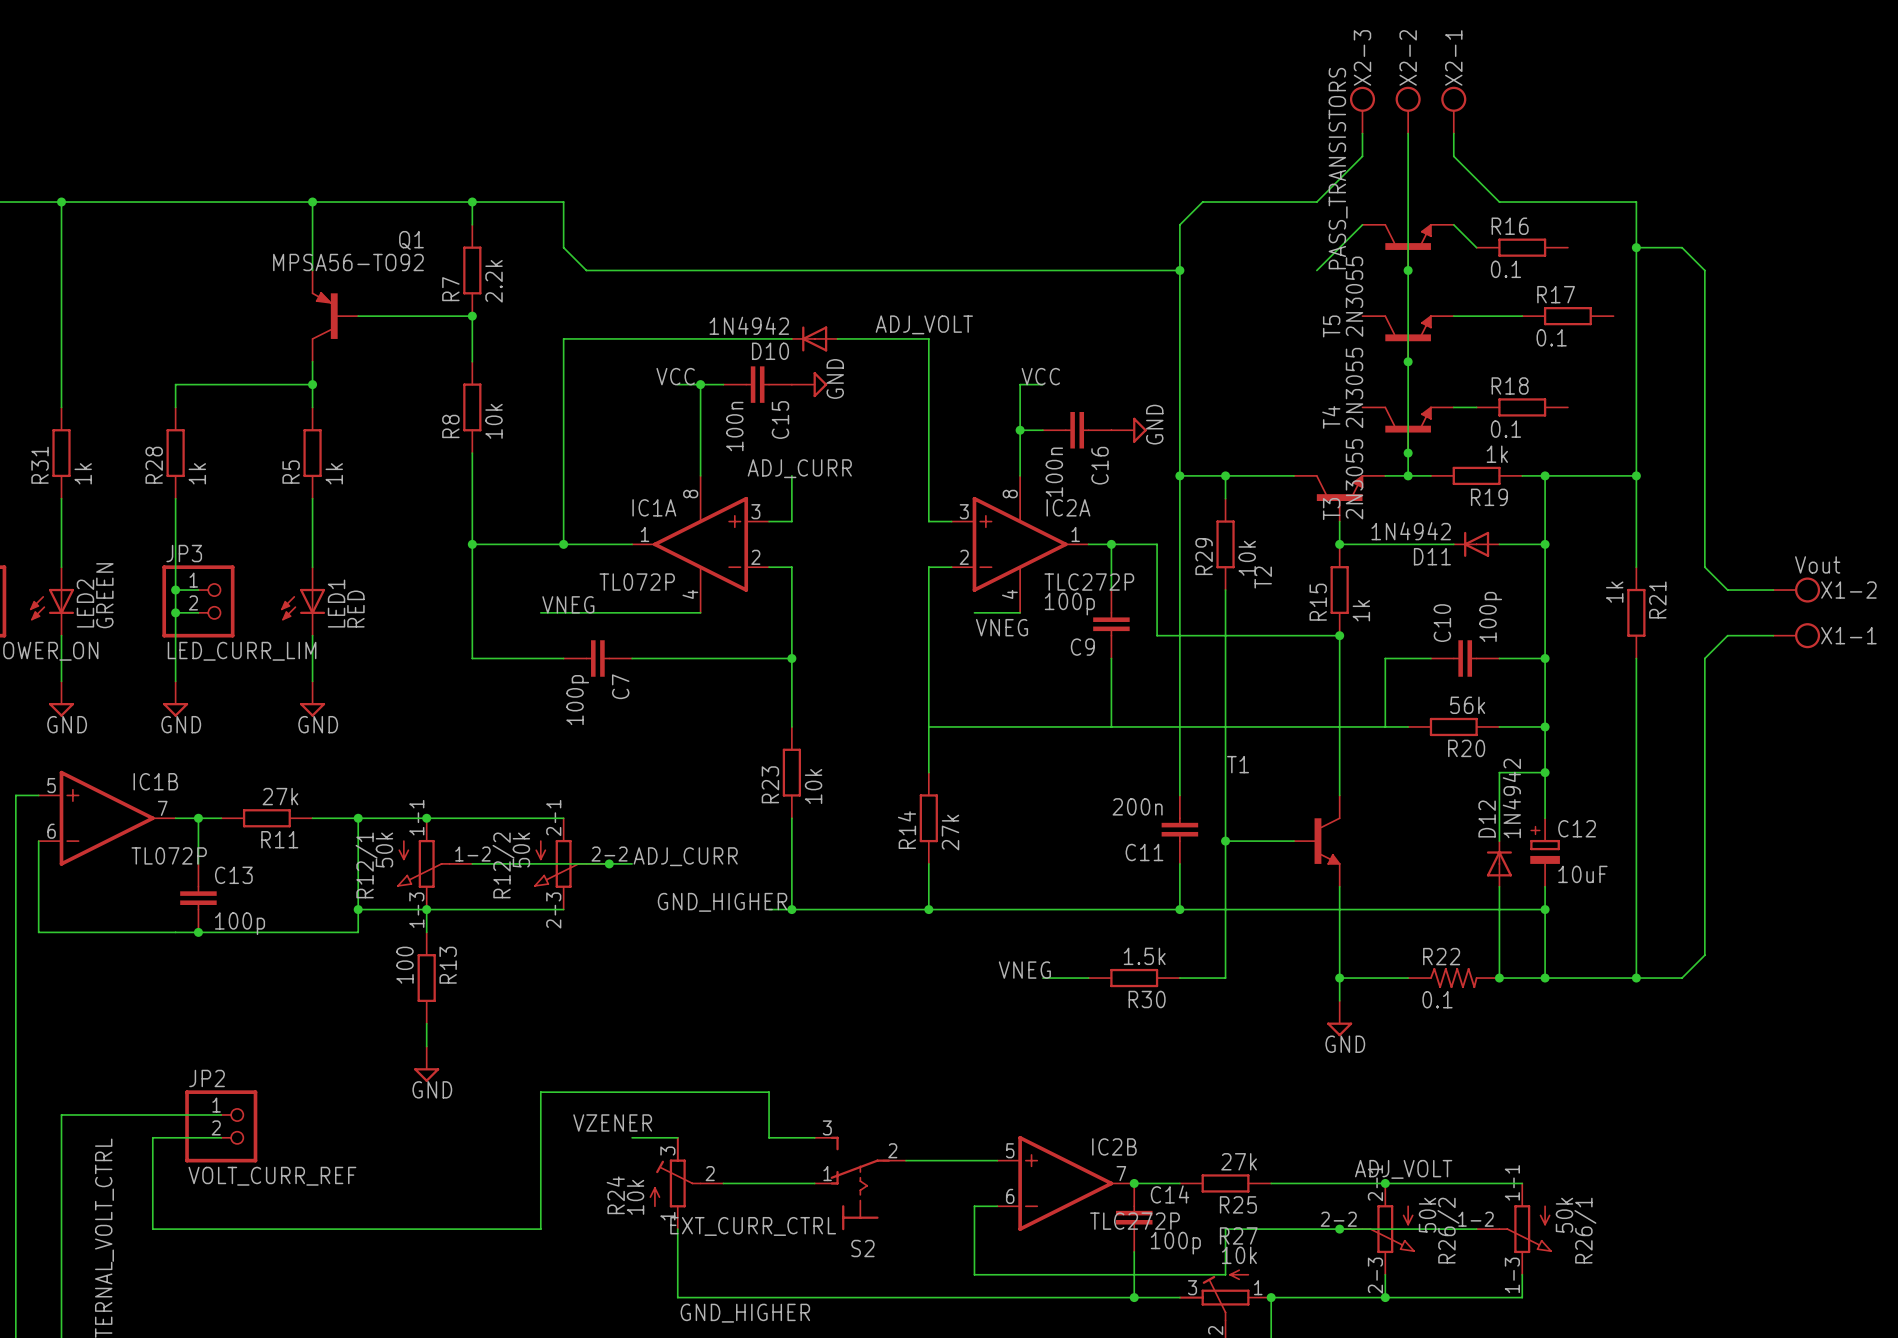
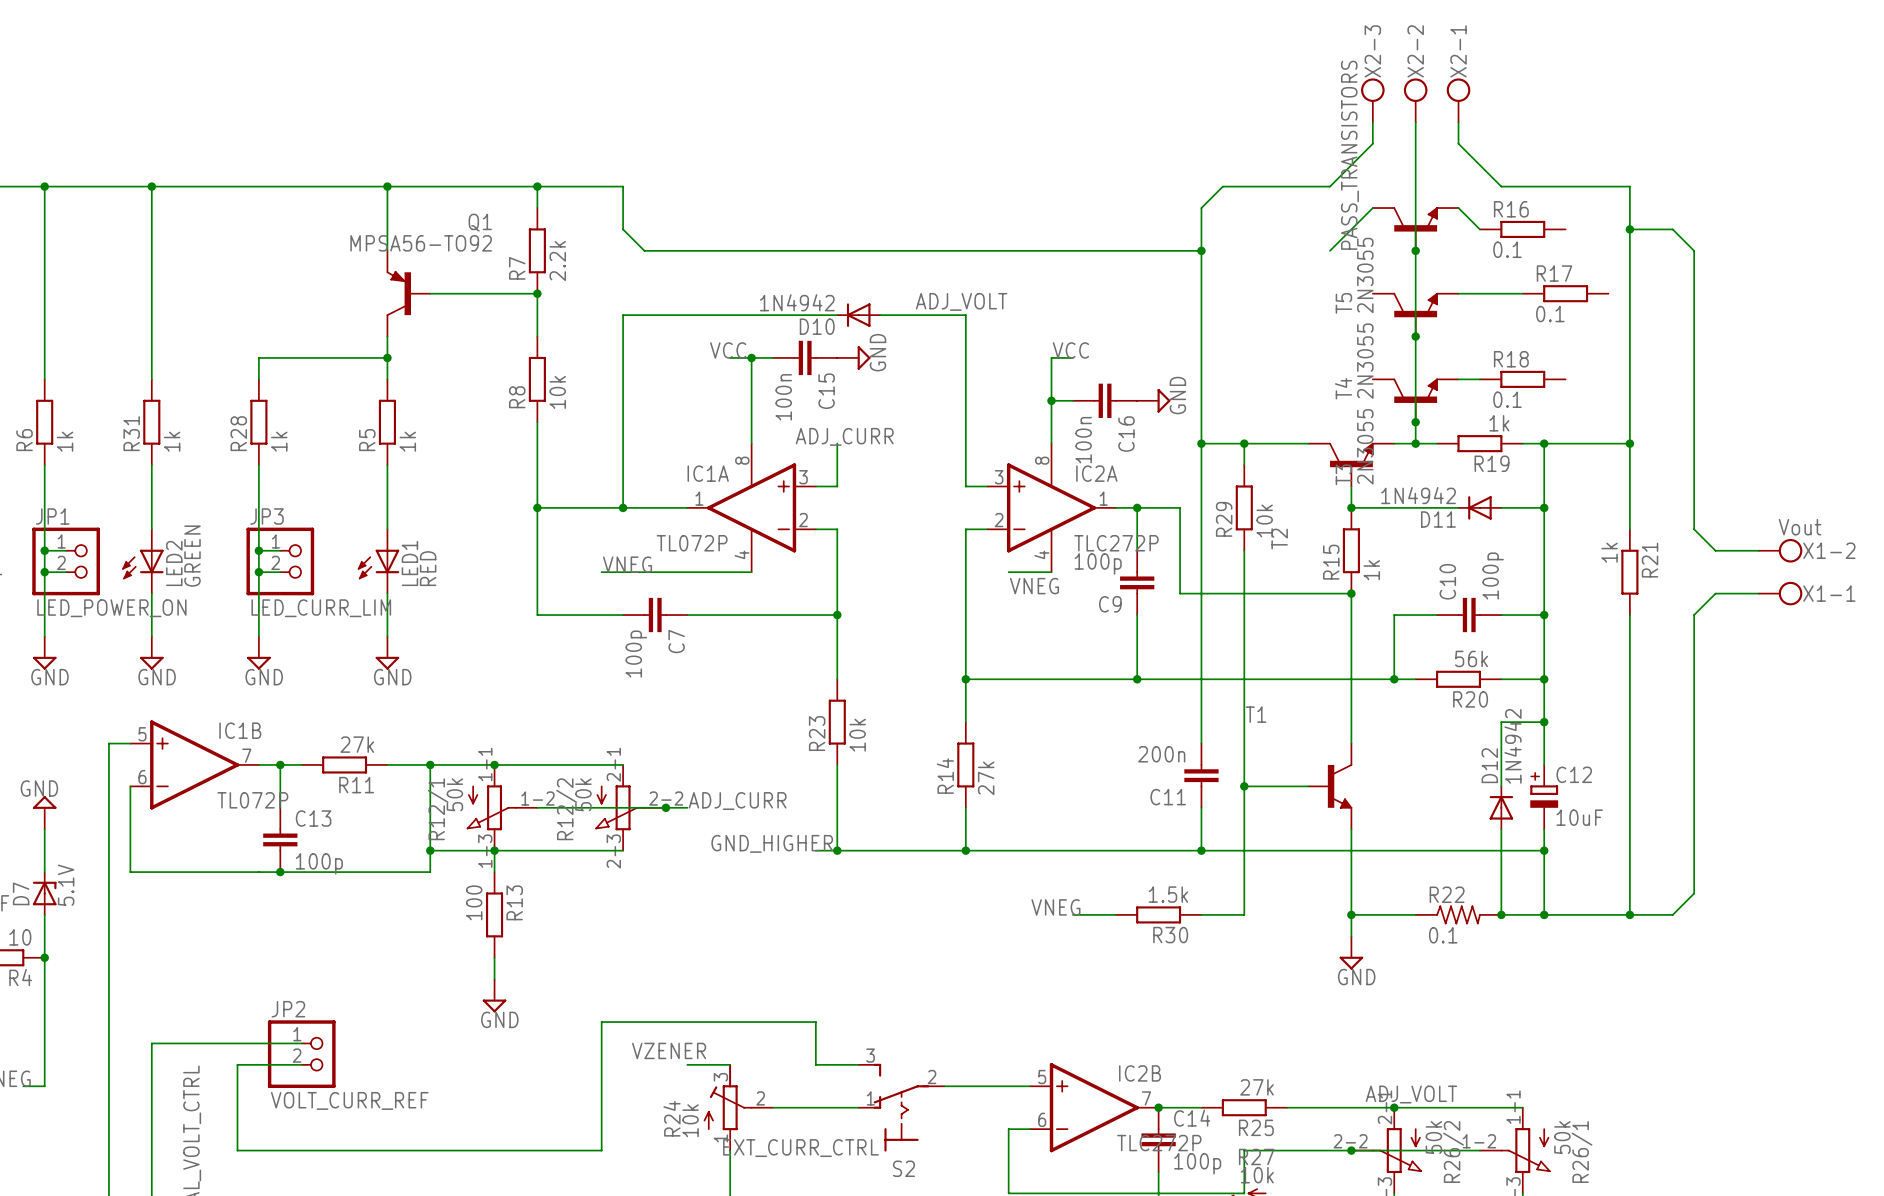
junction: none -> (965, 679)
junction: none -> (1137, 679)
junction: none -> (1394, 679)

